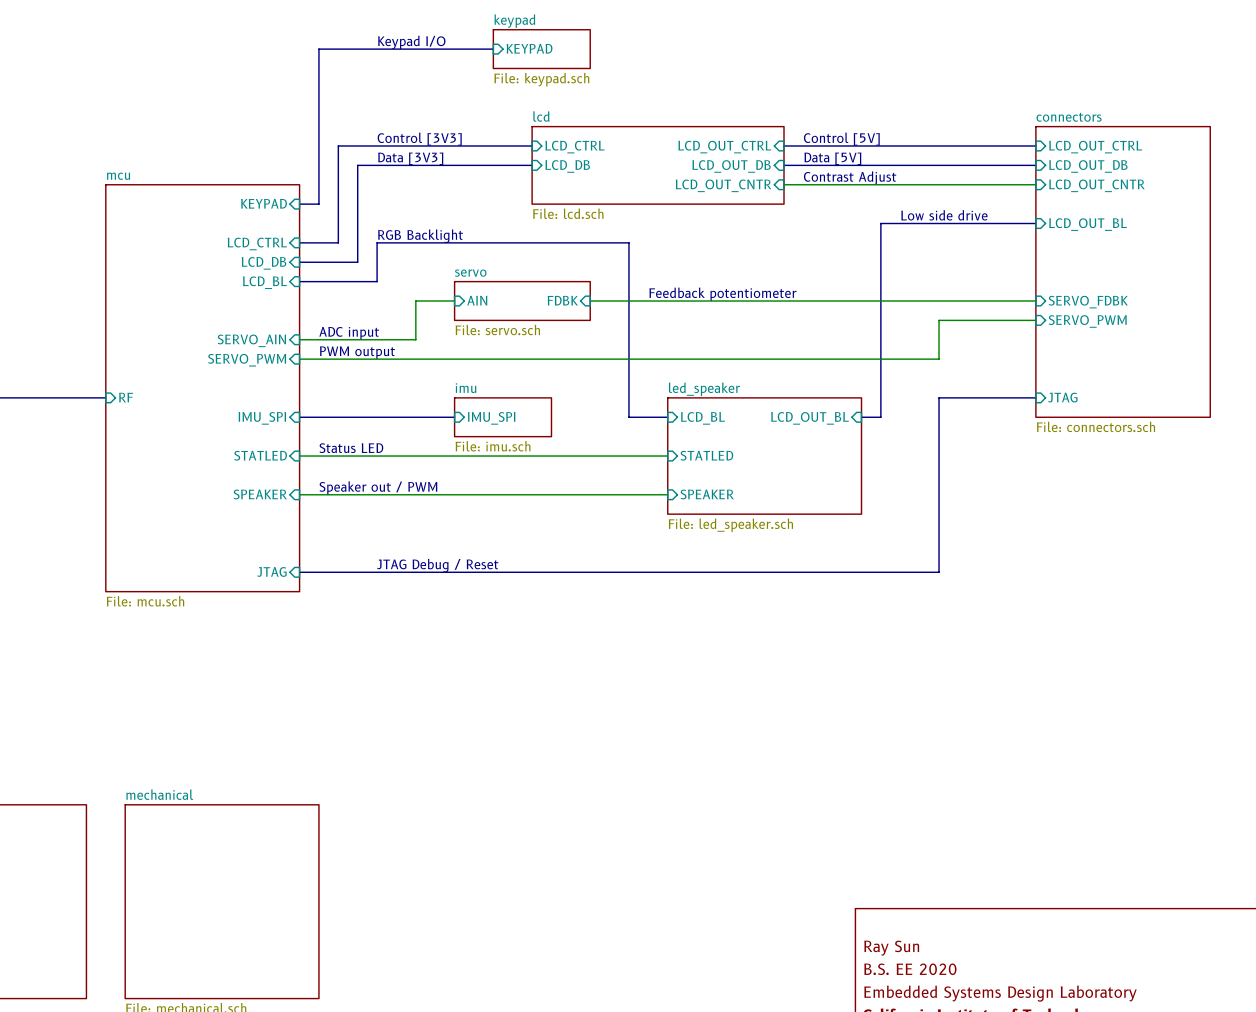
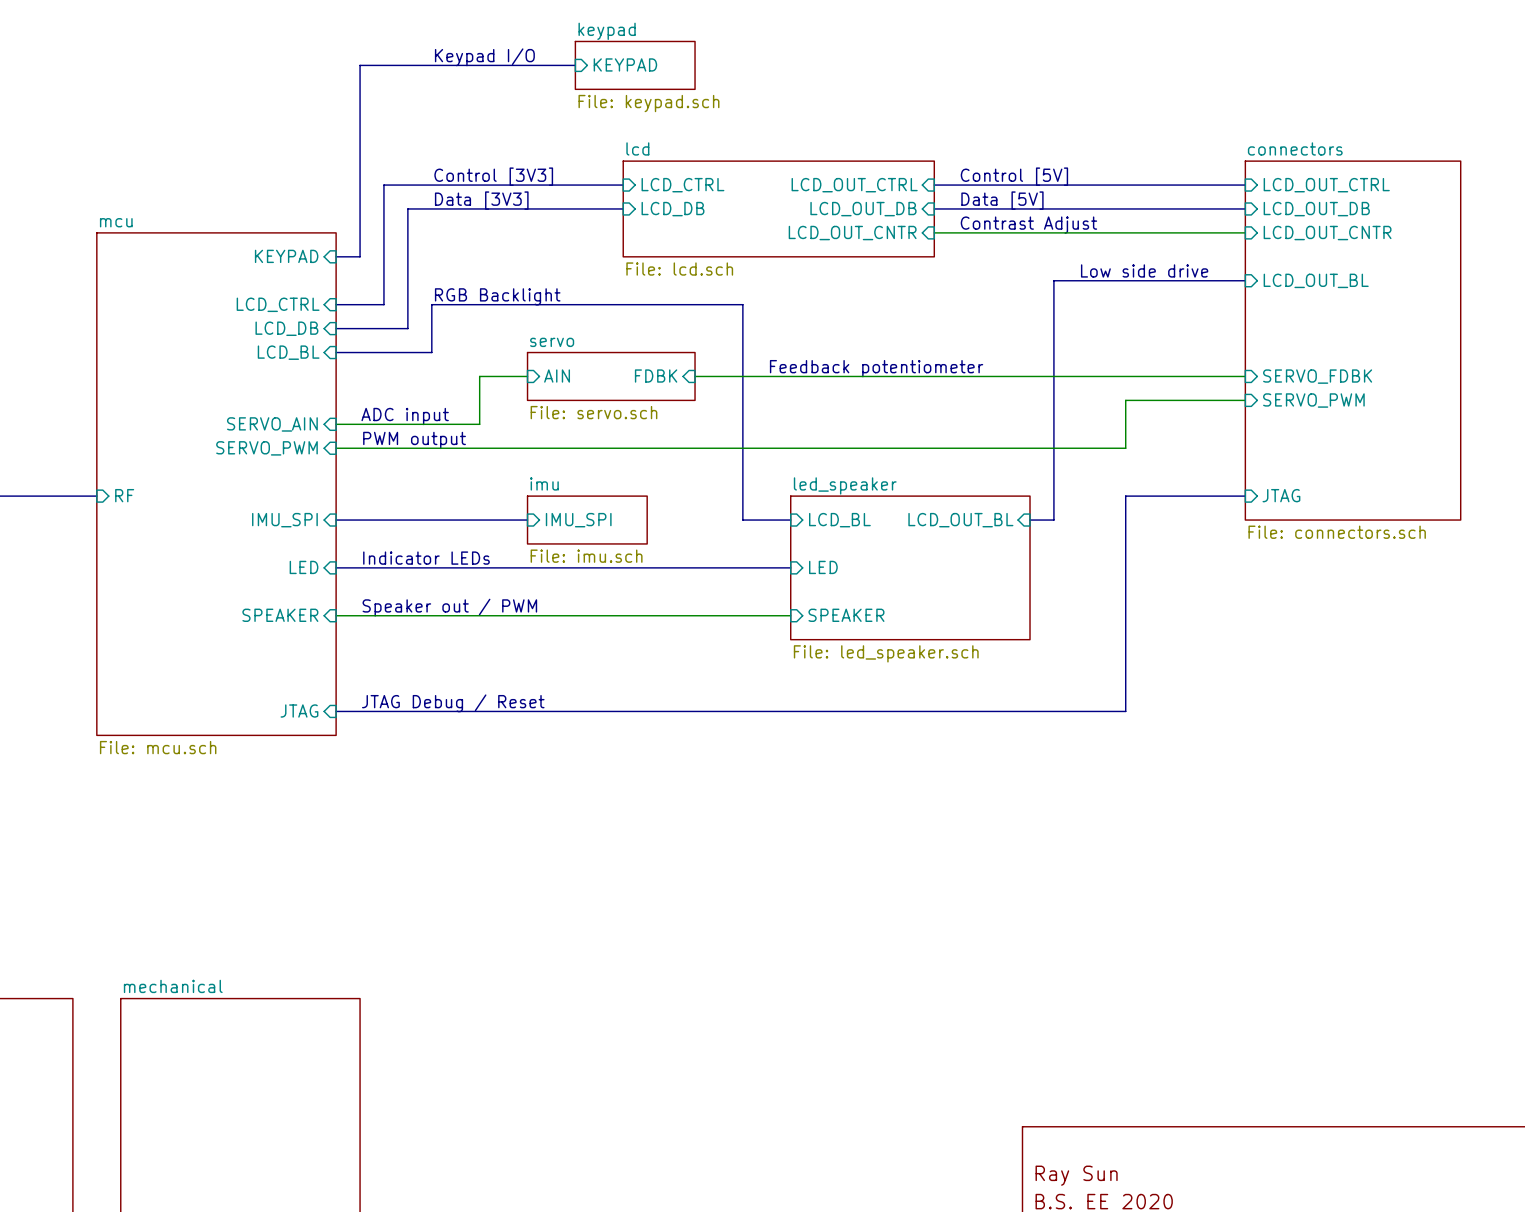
text: Status LED (351, 448) -> Indicator LEDs (426, 558)
sheet pin: STATLED (260, 455) -> LED (304, 567)
sheet pin: STATLED (706, 455) -> LED (823, 567)
bus: none -> (336, 567) (790, 567)
text position: JTAG Debug / Reset (437, 565) -> JTAG Debug / Reset (453, 703)

